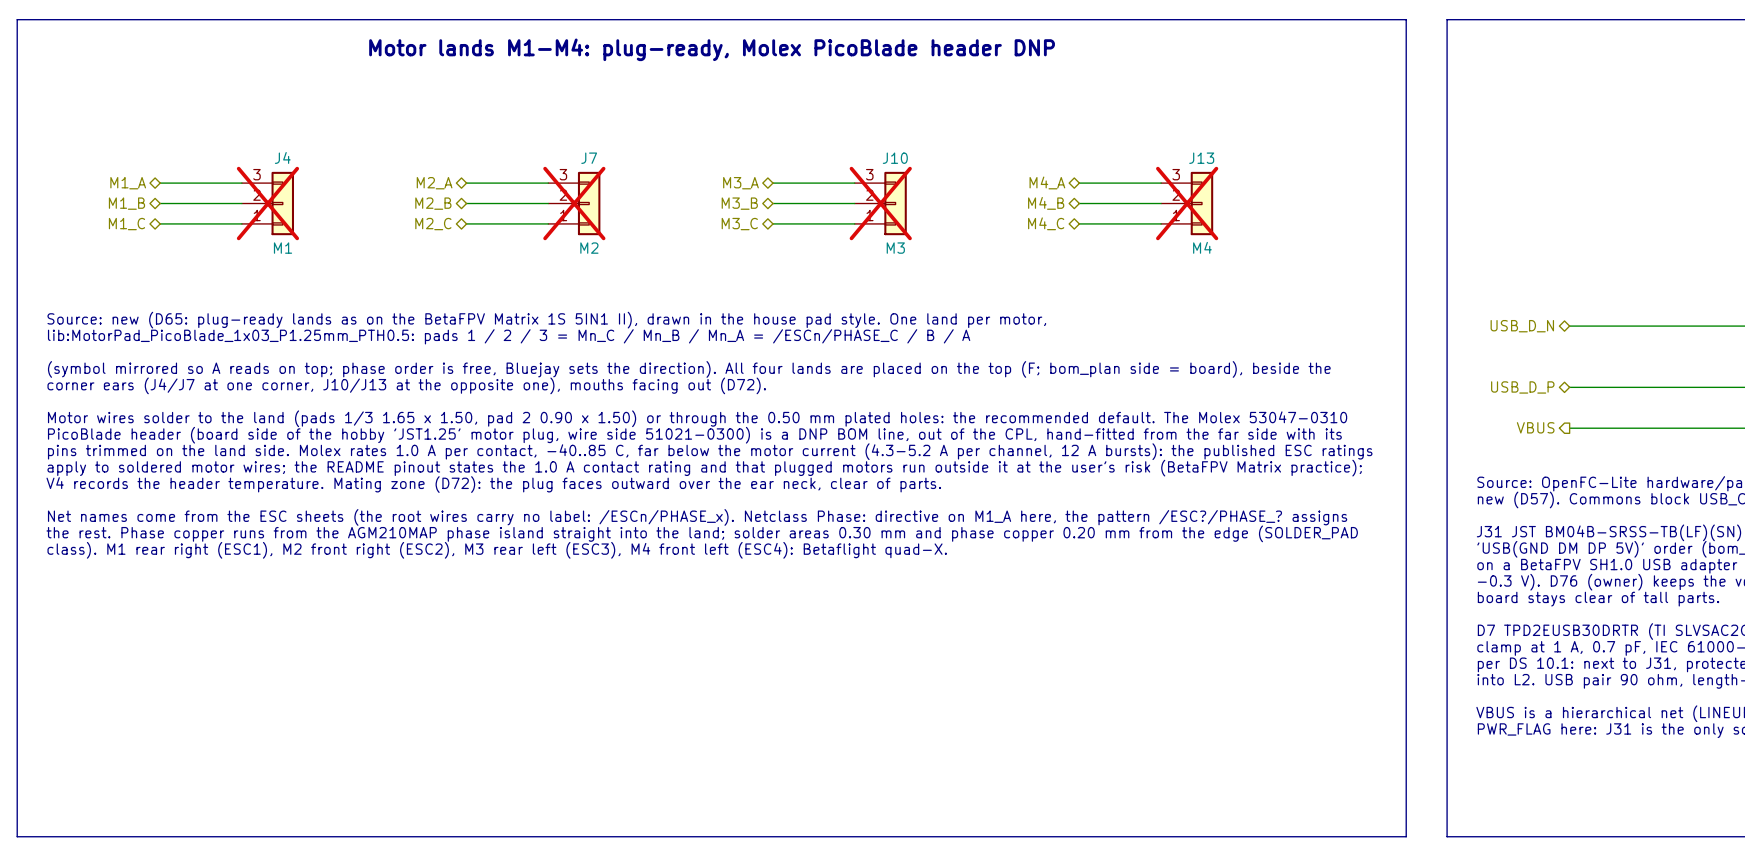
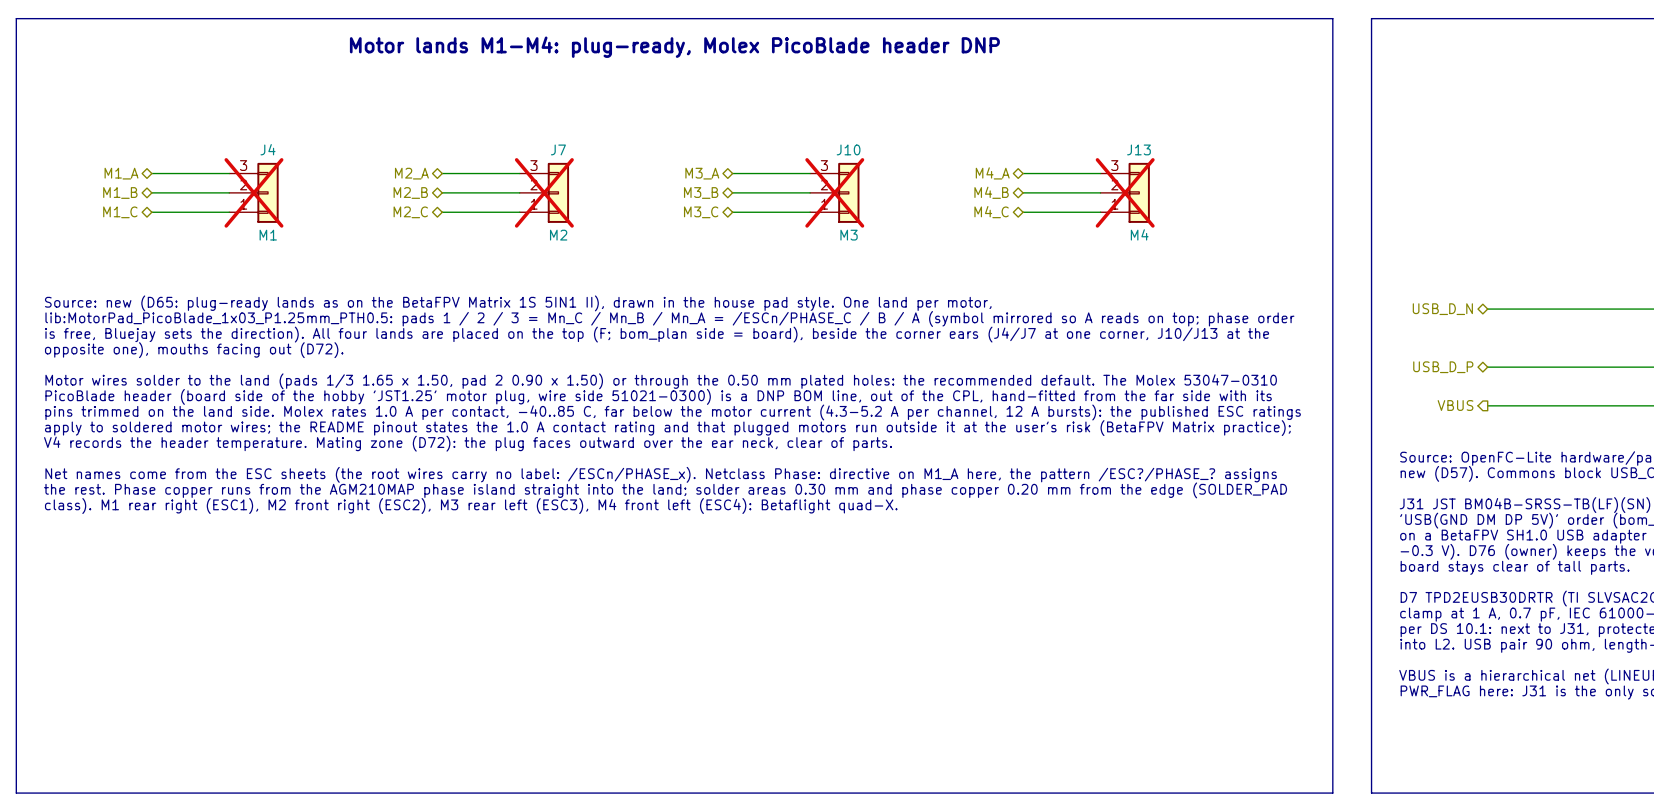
text: lib:MotorPad_PicoBlade_1x03_P1.25mm_PTH0.5: pads 1 / 2 / 3 = Mn_C / Mn_B / Mn_A = /ESCn/PHASE_C / B / A (509, 336) -> lib:MotorPad_PicoBlade_1x03_P1.25mm_PTH0.5: pads 1 / 2 / 3 = Mn_C / Mn_B / Mn_A = /ESCn/PHASE_C / B / A (symbol mirrored so A reads on top; phase order (669, 318)
text: none -> is free, Bluejay sets the direction). All four lands are placed on the top (F; bom_plan side = board), beside the corner ears (J4/J7 at one corner, J10/J13 at the (657, 334)
text: (symbol mirrored so A reads on top; phase order is free, Bluejay sets the direction). All four lands are placed on the top (F; bom_plan side = board), beside the (689, 369) -> opposite one), mouths facing out (D72). (194, 350)
text: corner ears (J4/J7 at one corner, J10/J13 at the opposite one), mouths facing out (D72). (406, 385) -> none
text: none -> Motor wires solder to the land (pads 1/3 1.65 x 1.50, pad 2 0.90 x 1.50) or through the 0.50 mm plated holes: the recommended default. The Molex 53047-0310 (661, 381)
text: Motor wires solder to the land (pads 1/3 1.65 x 1.50, pad 2 0.90 x 1.50) or through the 0.50 mm plated holes: the recommended default. The Molex 53047-0310 (697, 418) -> PicoBlade header (board side of the hobby 'JST1.25' motor plug, wire side 51021-0300) is a DNP BOM line, out of the CPL, hand-fitted from the far side with its (658, 396)
text: PicoBlade header (board side of the hobby 'JST1.25' motor plug, wire side 51021-0300) is a DNP BOM line, out of the CPL, hand-fitted from the far side with its (694, 435) -> pins trimmed on the land side. Molex rates 1.0 A per contact, -40..85 C, far below the motor current (4.3-5.2 A per channel, 12 A bursts): the published ESC ratings (673, 412)
text: pins trimmed on the land side. Molex rates 1.0 A per contact, -40..85 C, far below the motor current (4.3-5.2 A per channel, 12 A bursts): the published ESC ratings (710, 451) -> apply to soldered motor wires; the README pinout states the 1.0 A contact rating and that plugged motors run outside it at the user's risk (BetaFPV Matrix practice); (667, 428)
text: apply to soldered motor wires; the README pinout states the 1.0 A contact rating and that plugged motors run outside it at the user's risk (BetaFPV Matrix practice); (704, 468) -> V4 records the header temperature. Mating zone (D72): the plug faces outward over the ear neck, clear of parts. (468, 443)
text: V4 records the header temperature. Mating zone (D72): the plug faces outward over the ear neck, clear of parts. (493, 484) -> none
text: none -> Net names come from the ESC sheets (the root wires carry no label: /ESCn/PHASE_x). Netclass Phase: directive on M1_A here, the pattern /ESC?/PHASE_? assigns (661, 474)
text: Net names come from the ESC sheets (the root wires carry no label: /ESCn/PHASE_x). Netclass Phase: directive on M1_A here, the pattern /ESC?/PHASE_? assigns (697, 517) -> the rest. Phase copper runs from the AGM210MAP phase island straight into the land; solder areas 0.30 mm and phase copper 0.20 mm from the edge (SOLDER_PAD (665, 490)
text: the rest. Phase copper runs from the AGM210MAP phase island straight into the land; solder areas 0.30 mm and phase copper 0.20 mm from the edge (SOLDER_PAD (702, 533) -> class). M1 rear right (ESC1), M2 front right (ESC2), M3 rear left (ESC3), M4 front left (ESC4): Betaflight quad-X. (471, 506)
text: class). M1 rear right (ESC1), M2 front right (ESC2), M3 rear left (ESC3), M4 front left (ESC4): Betaflight quad-X. (497, 550) -> none

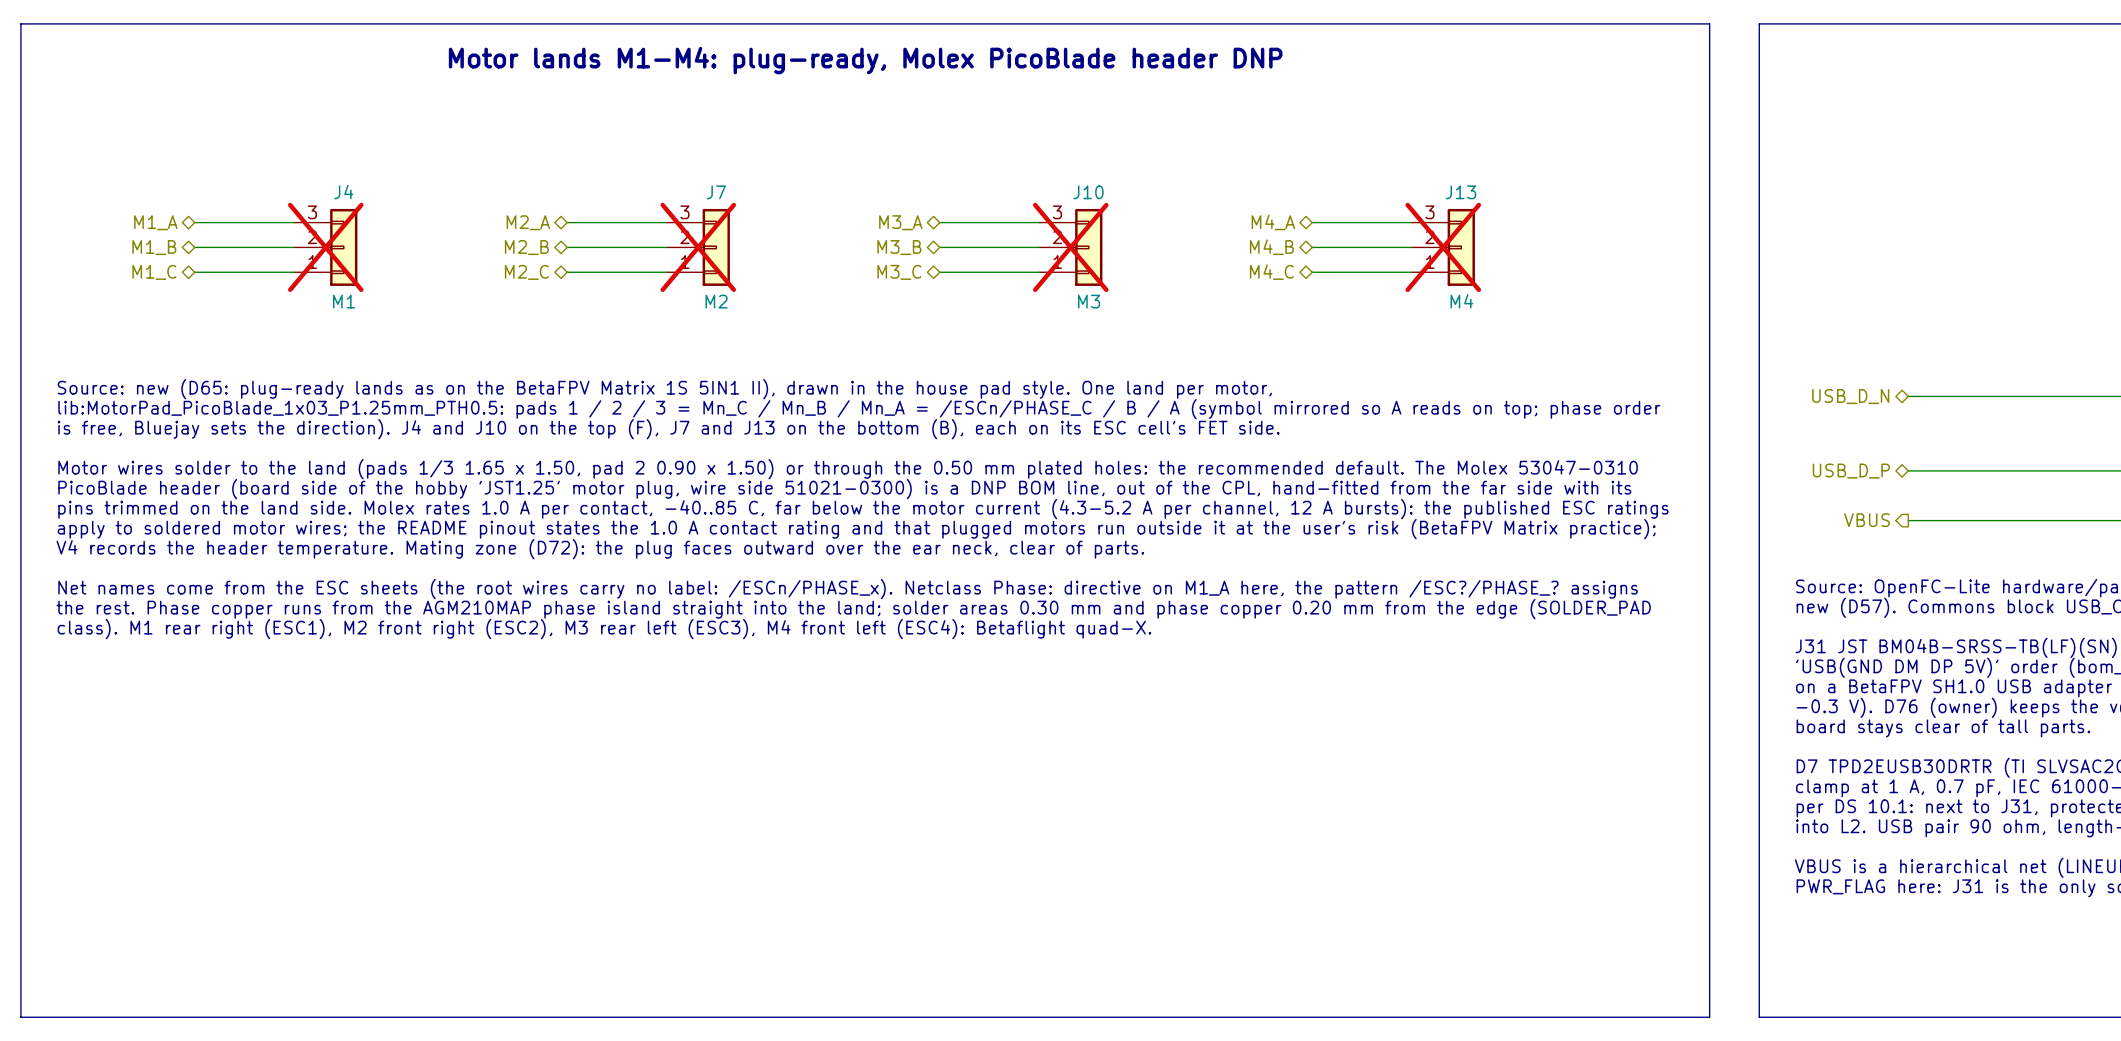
text: is free, Bluejay sets the direction). All four lands are placed on the top (F; bom_plan side = board), beside the corner ears (J4/J7 at one corner, J10/J13 at the (657, 334) -> is free, Bluejay sets the direction). J4 and J10 on the top (F), J7 and J13 on the bottom (B), each on its ESC cell's FET side. (668, 429)
text: opposite one), mouths facing out (D72). (194, 350) -> none
text: none -> Motor wires solder to the land (pads 1/3 1.65 x 1.50, pad 2 0.90 x 1.50) or through the 0.50 mm plated holes: the recommended default. The Molex 53047-0310 (848, 469)
text: Motor wires solder to the land (pads 1/3 1.65 x 1.50, pad 2 0.90 x 1.50) or through the 0.50 mm plated holes: the recommended default. The Molex 53047-0310 (661, 381) -> PicoBlade header (board side of the hobby 'JST1.25' motor plug, wire side 51021-0300) is a DNP BOM line, out of the CPL, hand-fitted from the far side with its (844, 489)
text: PicoBlade header (board side of the hobby 'JST1.25' motor plug, wire side 51021-0300) is a DNP BOM line, out of the CPL, hand-fitted from the far side with its (658, 396) -> pins trimmed on the land side. Molex rates 1.0 A per contact, -40..85 C, far below the motor current (4.3-5.2 A per channel, 12 A bursts): the published ESC ratings (863, 509)
text: pins trimmed on the land side. Molex rates 1.0 A per contact, -40..85 C, far below the motor current (4.3-5.2 A per channel, 12 A bursts): the published ESC ratings (673, 412) -> apply to soldered motor wires; the README pinout states the 1.0 A contact rating and that plugged motors run outside it at the user's risk (BetaFPV Matrix practice); (856, 529)
text: apply to soldered motor wires; the README pinout states the 1.0 A contact rating and that plugged motors run outside it at the user's risk (BetaFPV Matrix practice); (667, 428) -> V4 records the header temperature. Mating zone (D72): the plug faces outward over the ear neck, clear of parts. (600, 549)
text: V4 records the header temperature. Mating zone (D72): the plug faces outward over the ear neck, clear of parts. (468, 443) -> none
text: none -> Net names come from the ESC sheets (the root wires carry no label: /ESCn/PHASE_x). Netclass Phase: directive on M1_A here, the pattern /ESC?/PHASE_? assigns (848, 589)
text: Net names come from the ESC sheets (the root wires carry no label: /ESCn/PHASE_x). Netclass Phase: directive on M1_A here, the pattern /ESC?/PHASE_? assigns (661, 474) -> the rest. Phase copper runs from the AGM210MAP phase island straight into the land; solder areas 0.30 mm and phase copper 0.20 mm from the edge (SOLDER_PAD (853, 609)
text: the rest. Phase copper runs from the AGM210MAP phase island straight into the land; solder areas 0.30 mm and phase copper 0.20 mm from the edge (SOLDER_PAD (665, 490) -> class). M1 rear right (ESC1), M2 front right (ESC2), M3 rear left (ESC3), M4 front left (ESC4): Betaflight quad-X. (604, 629)
text: class). M1 rear right (ESC1), M2 front right (ESC2), M3 rear left (ESC3), M4 front left (ESC4): Betaflight quad-X. (471, 506) -> none

